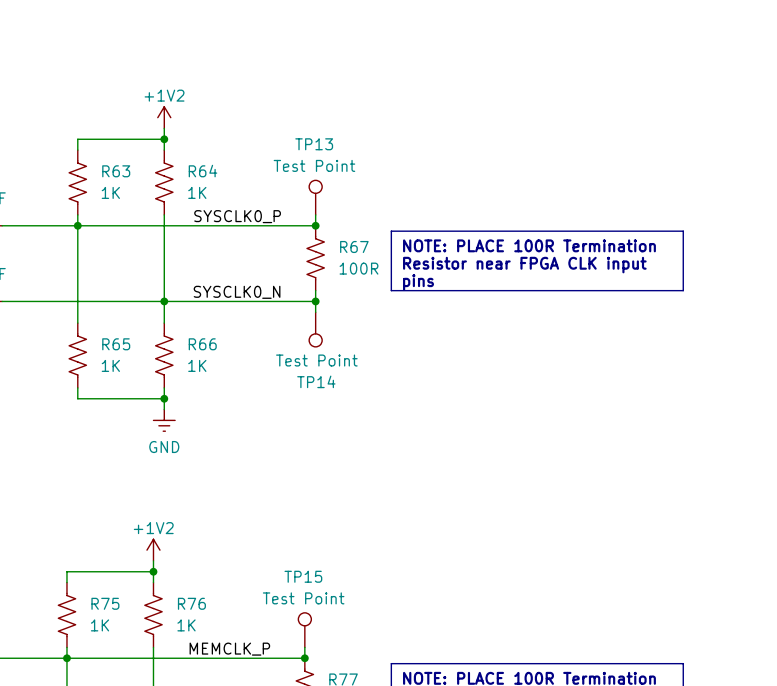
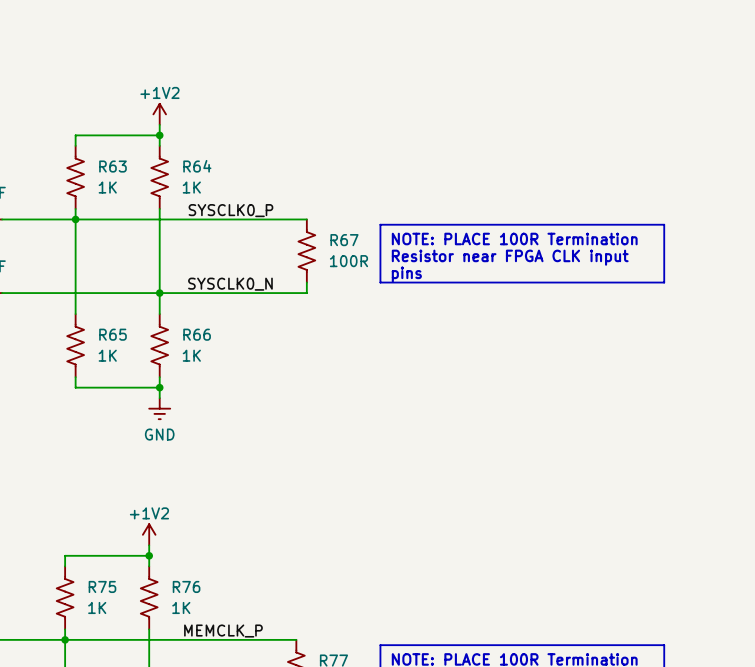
TP13: Test Point (315, 197) -> none
wire: (315, 214) (315, 225) -> none
junction: (315, 225) -> none
wire: (315, 301) (315, 312) -> none
junction: (315, 301) -> none
TP14: Test Point (315, 329) -> none
TP15: Test Point (304, 630) -> none
wire: (304, 647) (304, 658) -> none
junction: (304, 658) -> none

